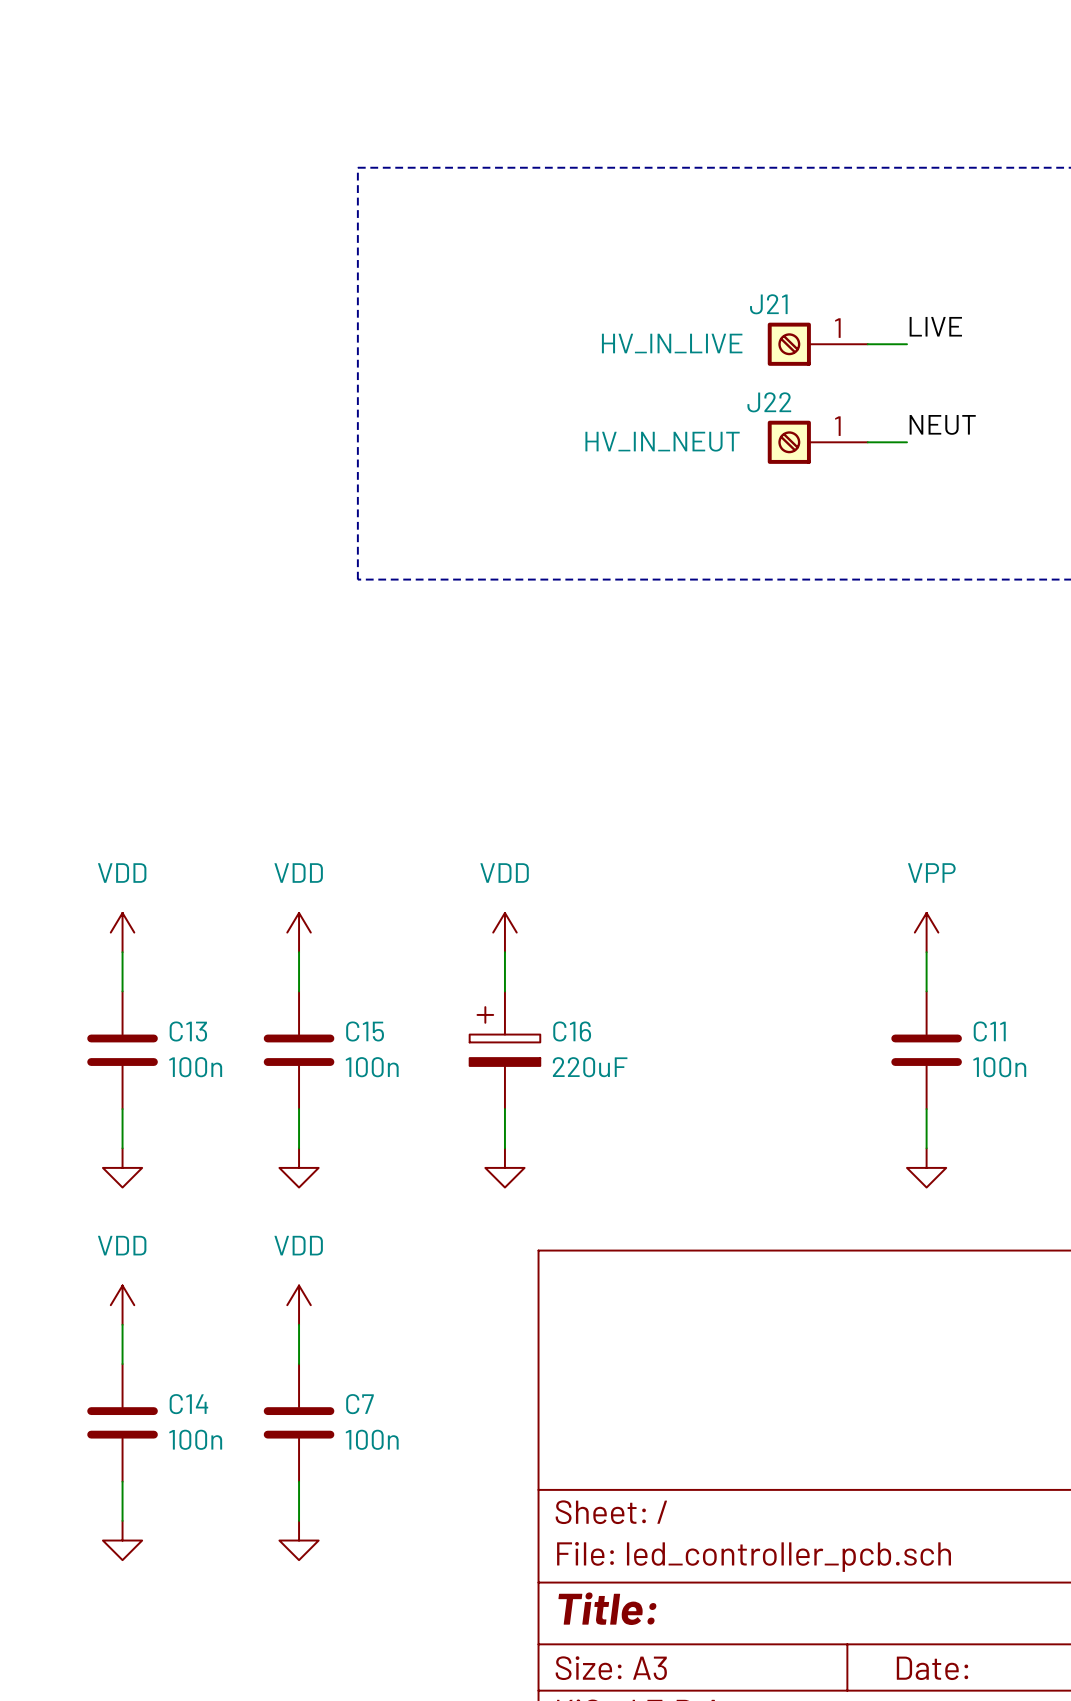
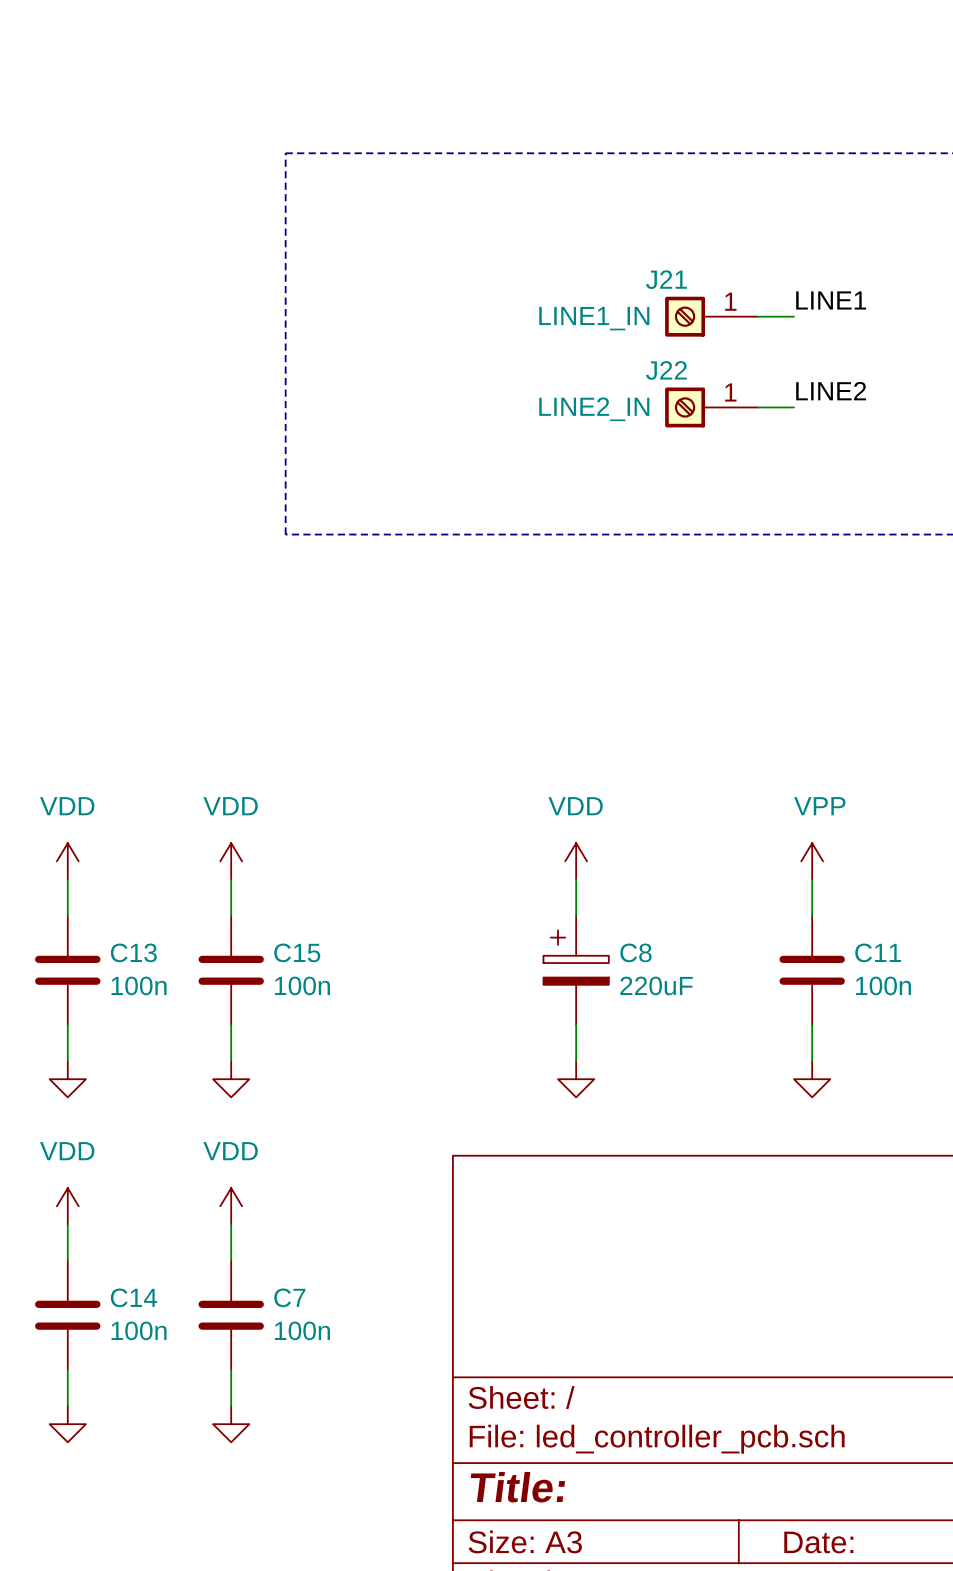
label: LIVE (935, 326) -> LINE1 (831, 300)
J21 value: HV_IN_LIVE (672, 343) -> LINE1_IN (594, 318)
label: NEUT (942, 424) -> LINE2 (831, 391)
J22 value: HV_IN_NEUT (662, 441) -> LINE2_IN (594, 409)
power symbol position: VDD (504, 932) -> VDD (576, 861)
wire: (504, 952) (504, 991) -> (576, 879) (576, 915)
C16: 220uF (504, 1050) -> none
C8: none -> 220uF (576, 970)
wire: (504, 1109) (504, 1148) -> (576, 1024) (576, 1061)
power symbol position: (504, 1167) -> (576, 1079)

